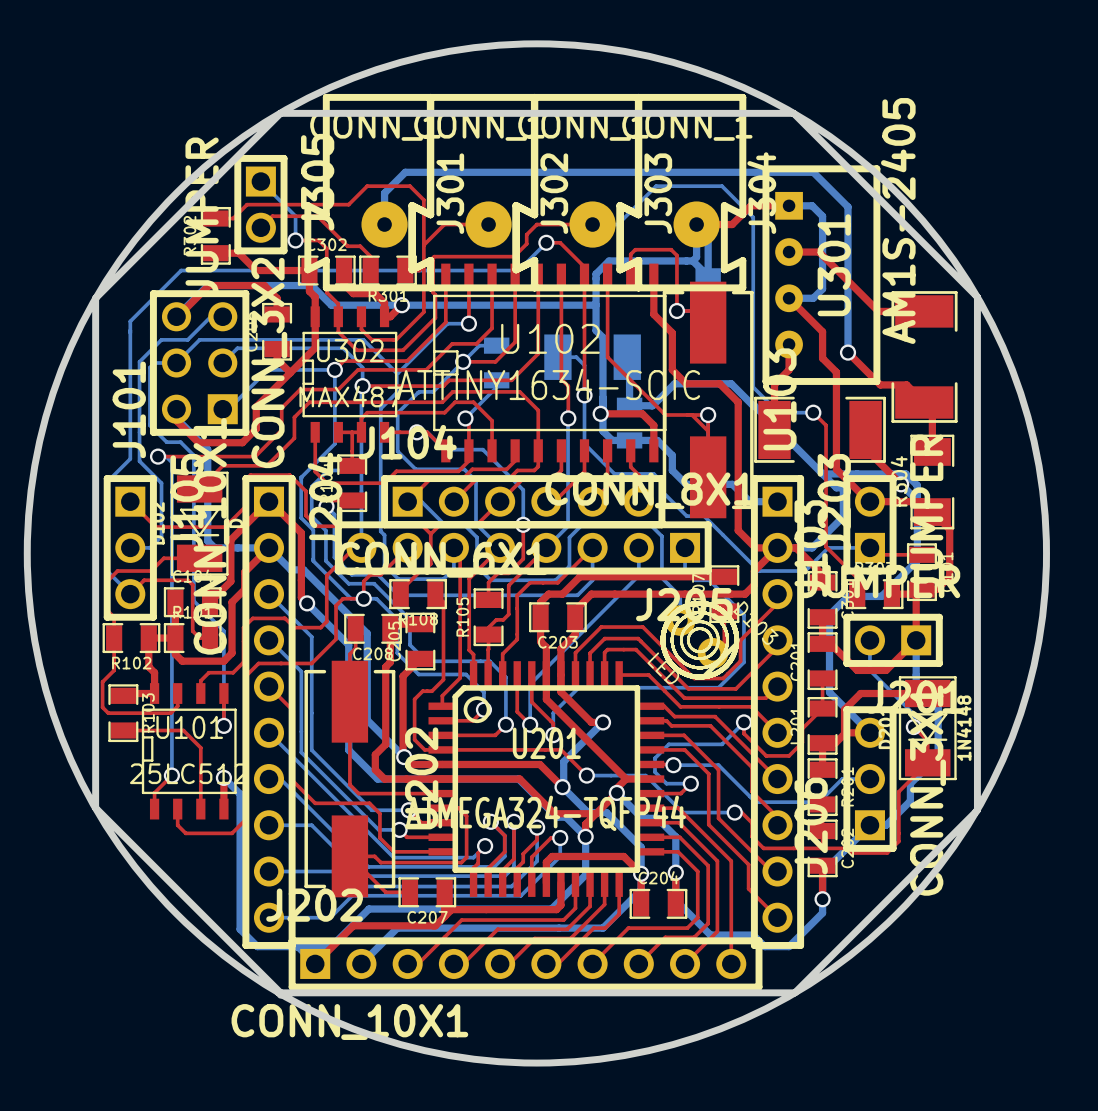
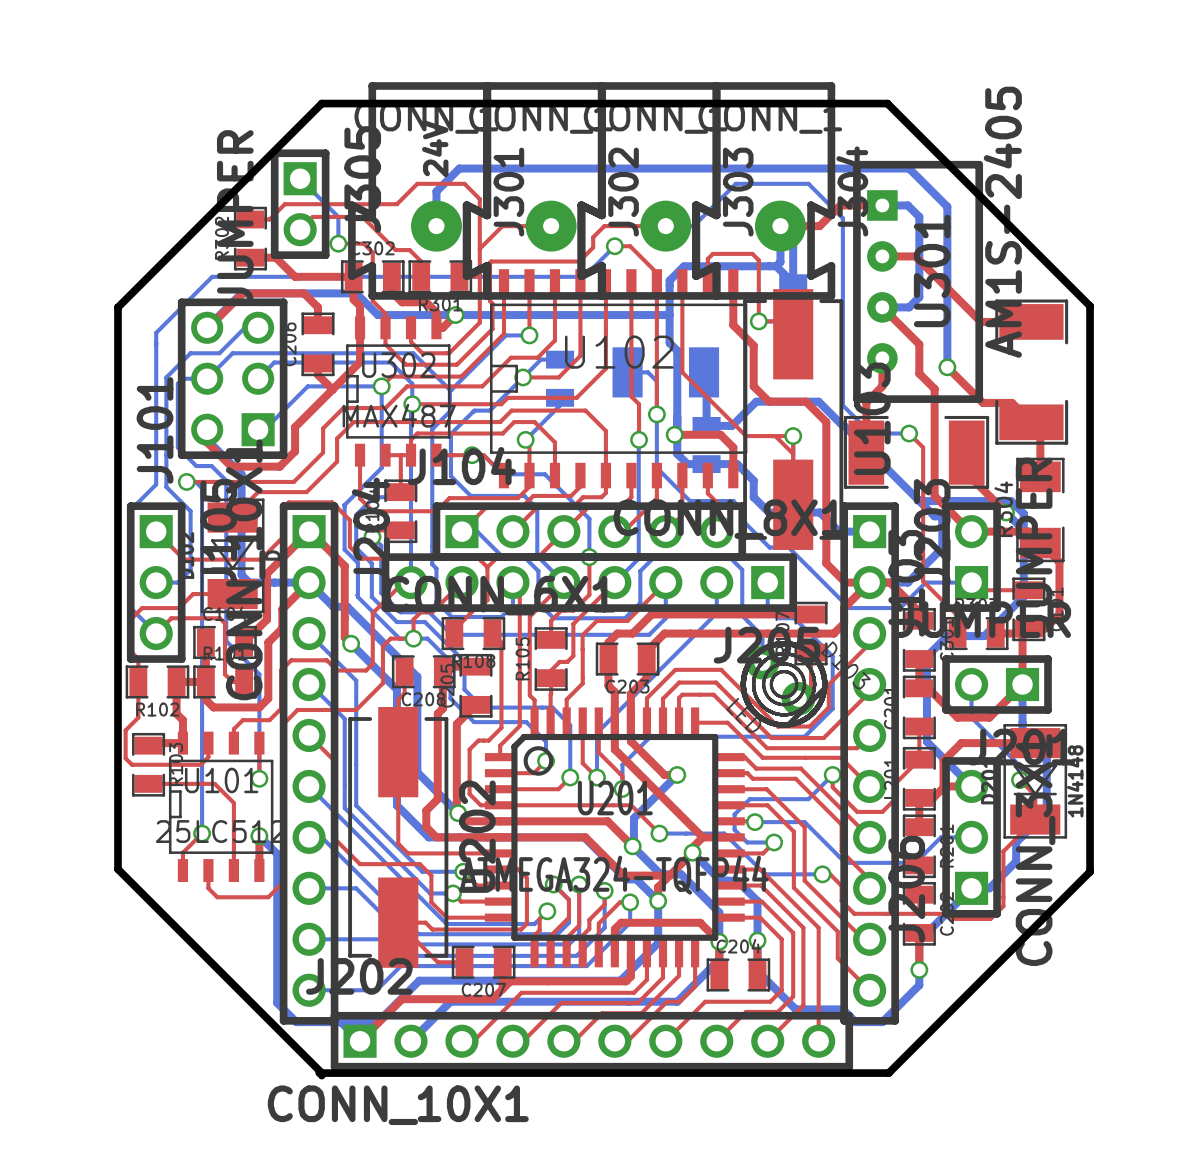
round board edge: [23, 40, 1050, 1067] -> none
text: none -> 24V (435, 148)
J101 value: CONN_3X2 (269, 362) -> none
U102 value: ATTINY1634-SOIC (548, 384) -> none

